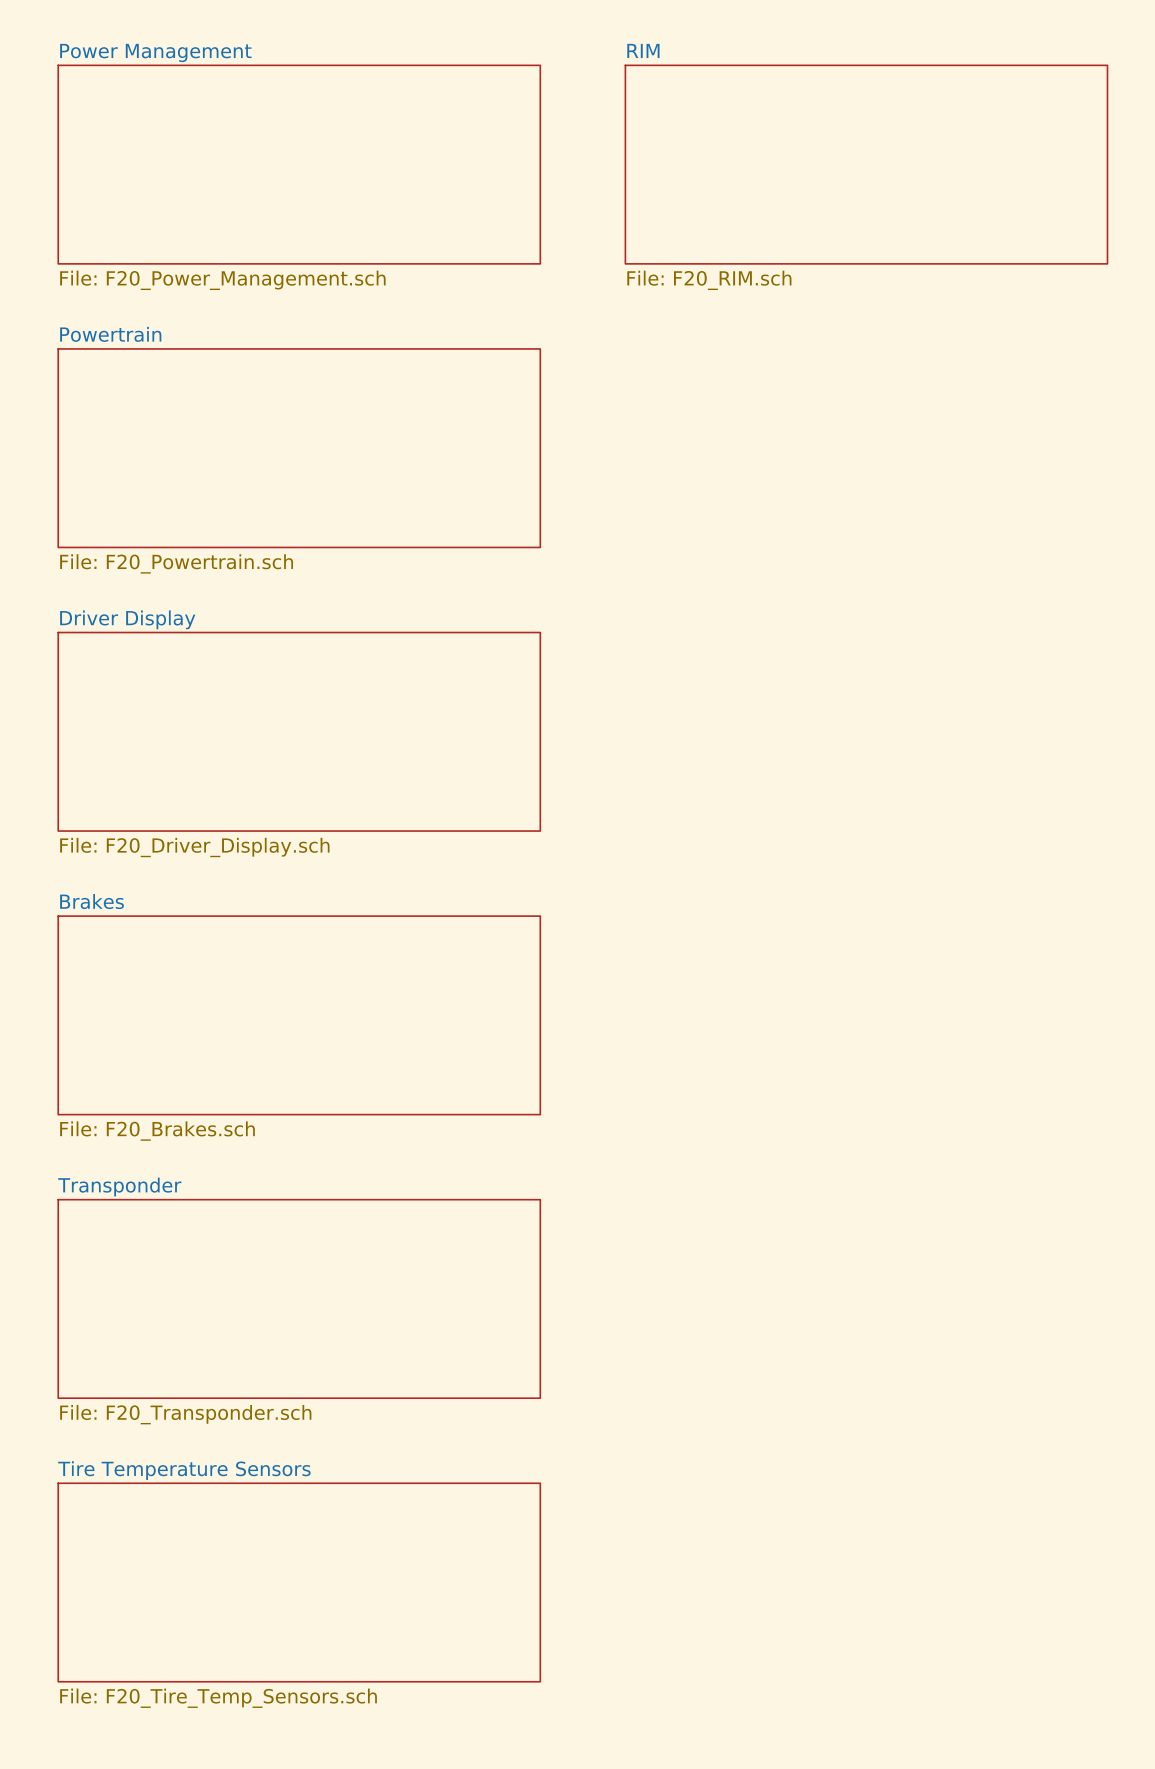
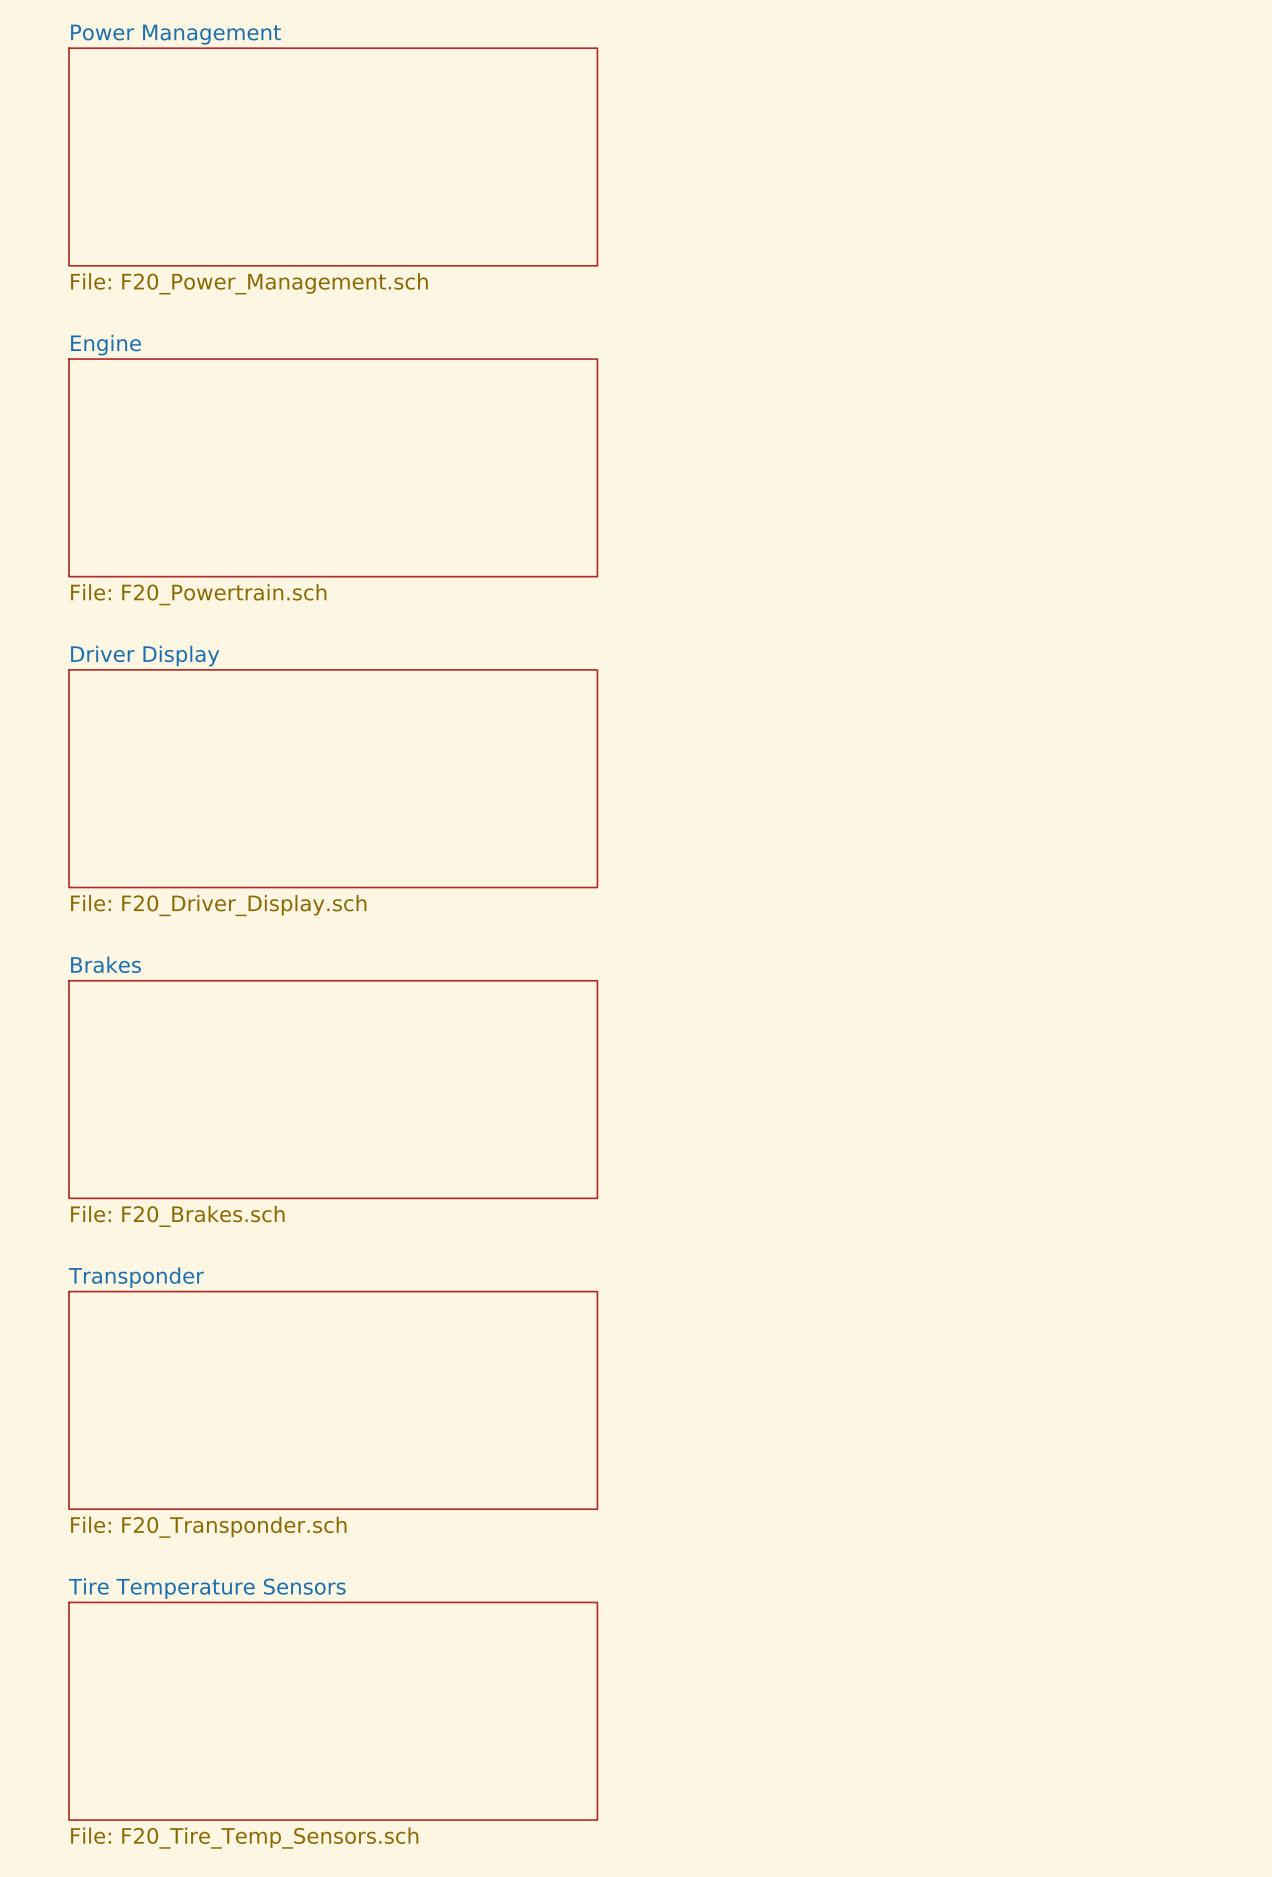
sheet RIM: File: F20_RIM.sch (866, 164) -> none
sheet Powertrain name: Powertrain (110, 334) -> Engine (105, 345)

